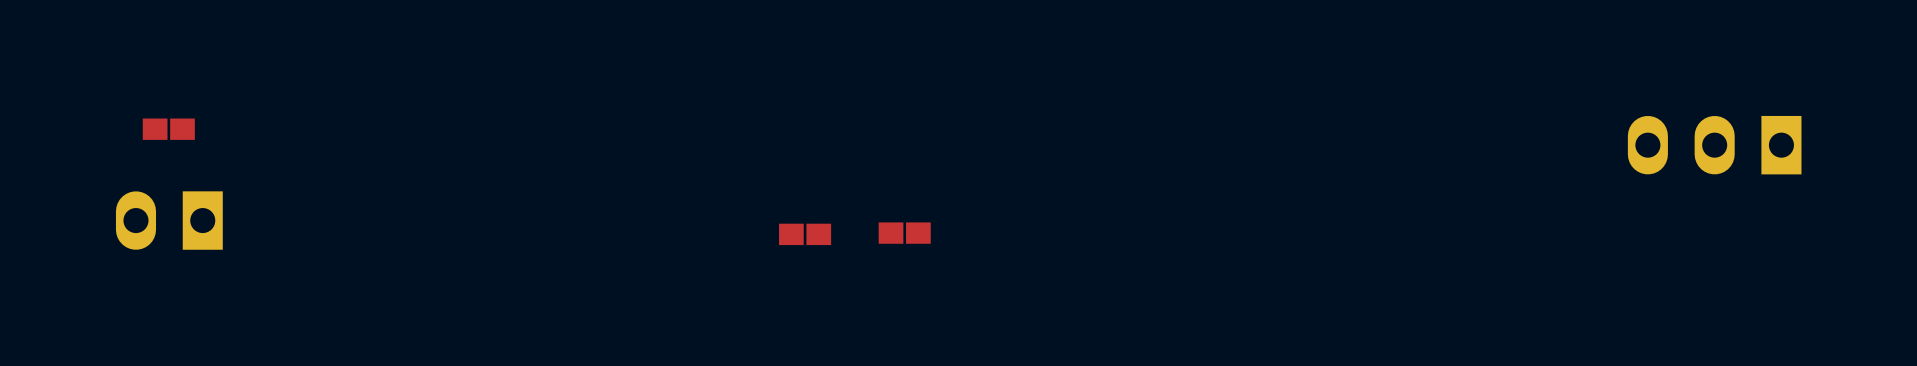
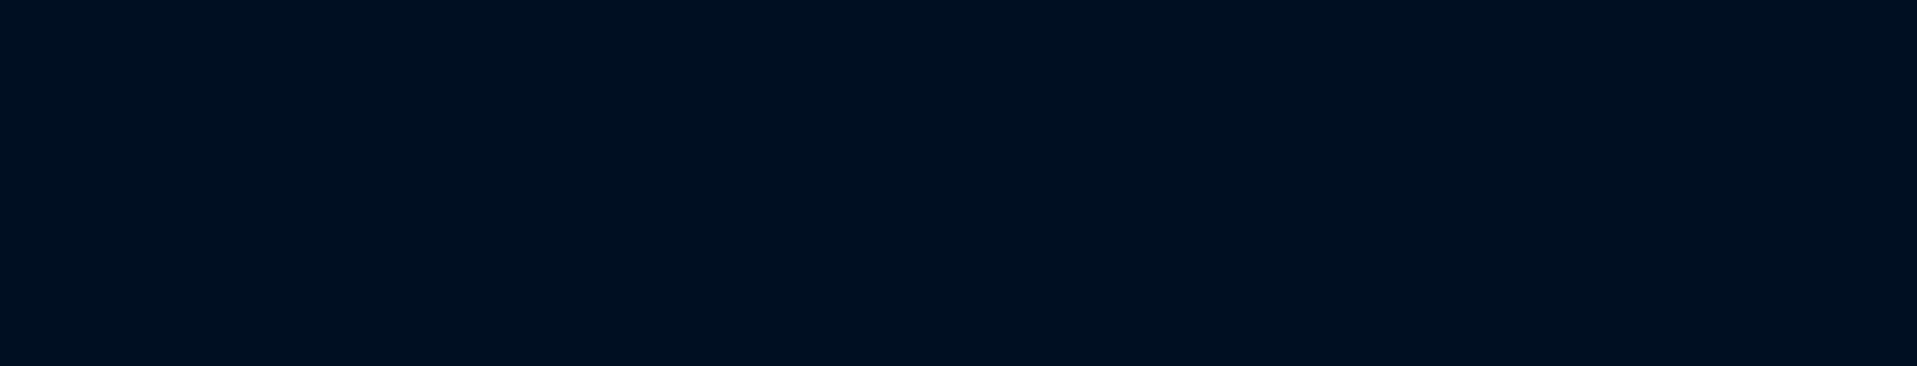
part: (168, 129) -> none
part: (1714, 145) -> none
part: (169, 220) -> none
part: (904, 233) -> none
part: (805, 234) -> none

